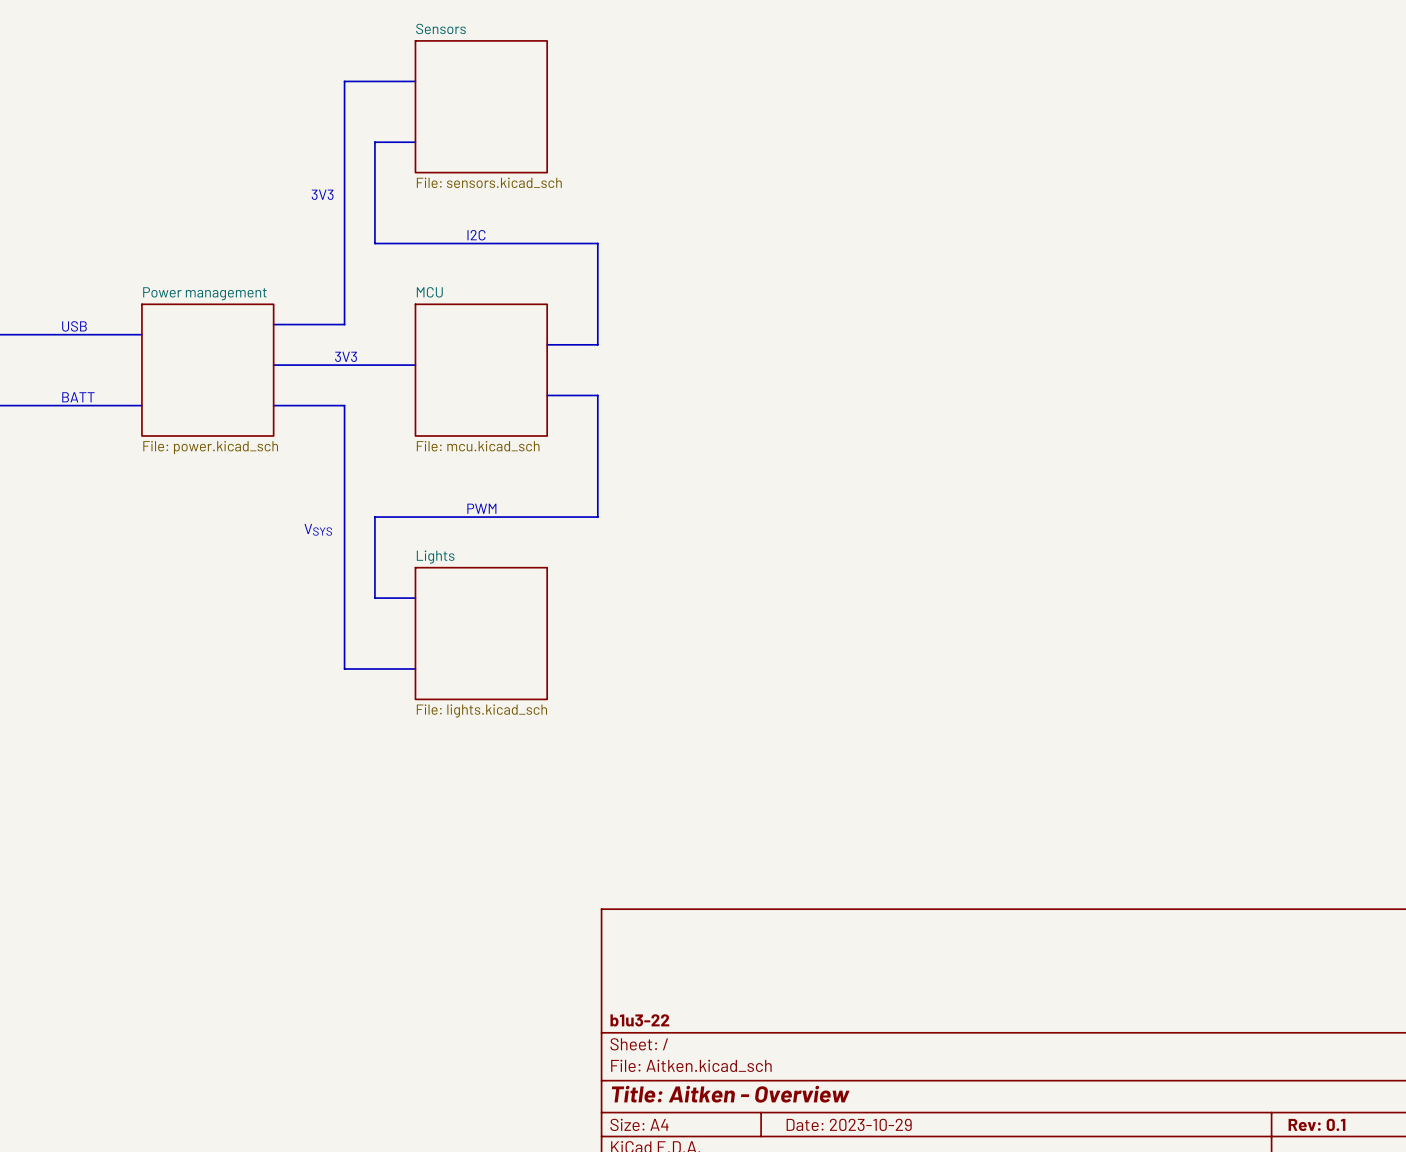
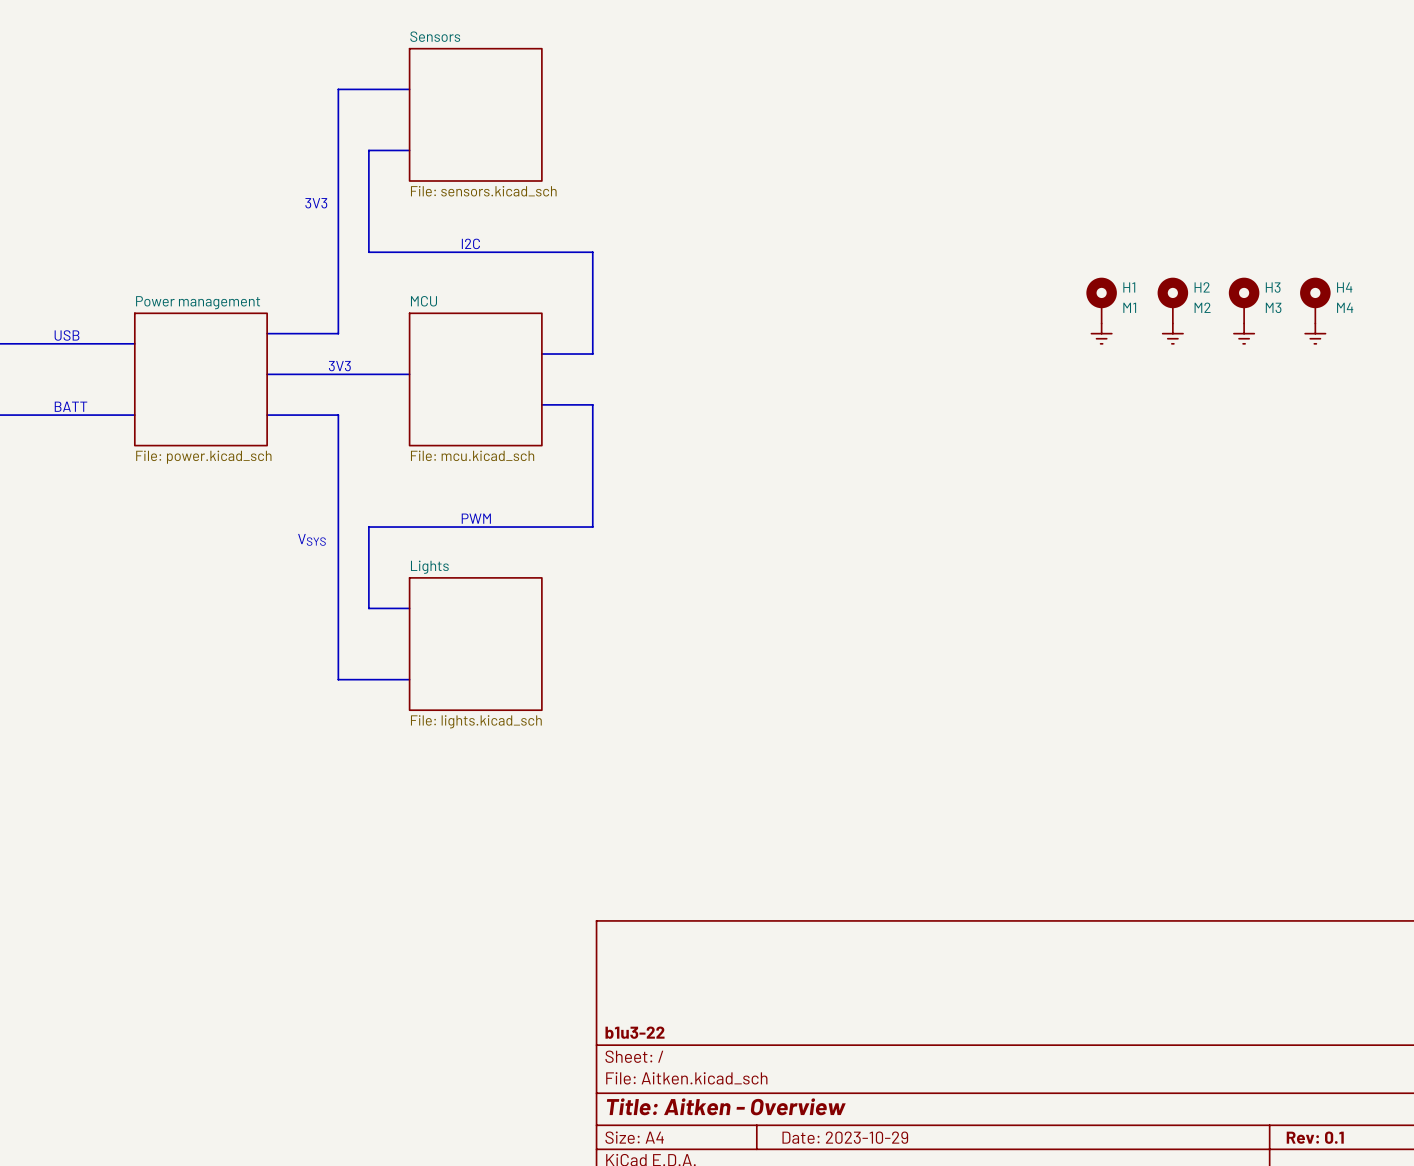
H1: none -> M1 (1101, 300)
H2: none -> M2 (1172, 300)
H3: none -> M3 (1244, 300)
H4: none -> M4 (1315, 300)
power symbol: none -> (1101, 333)
power symbol: none -> (1172, 333)
power symbol: none -> (1244, 333)
power symbol: none -> (1315, 333)

